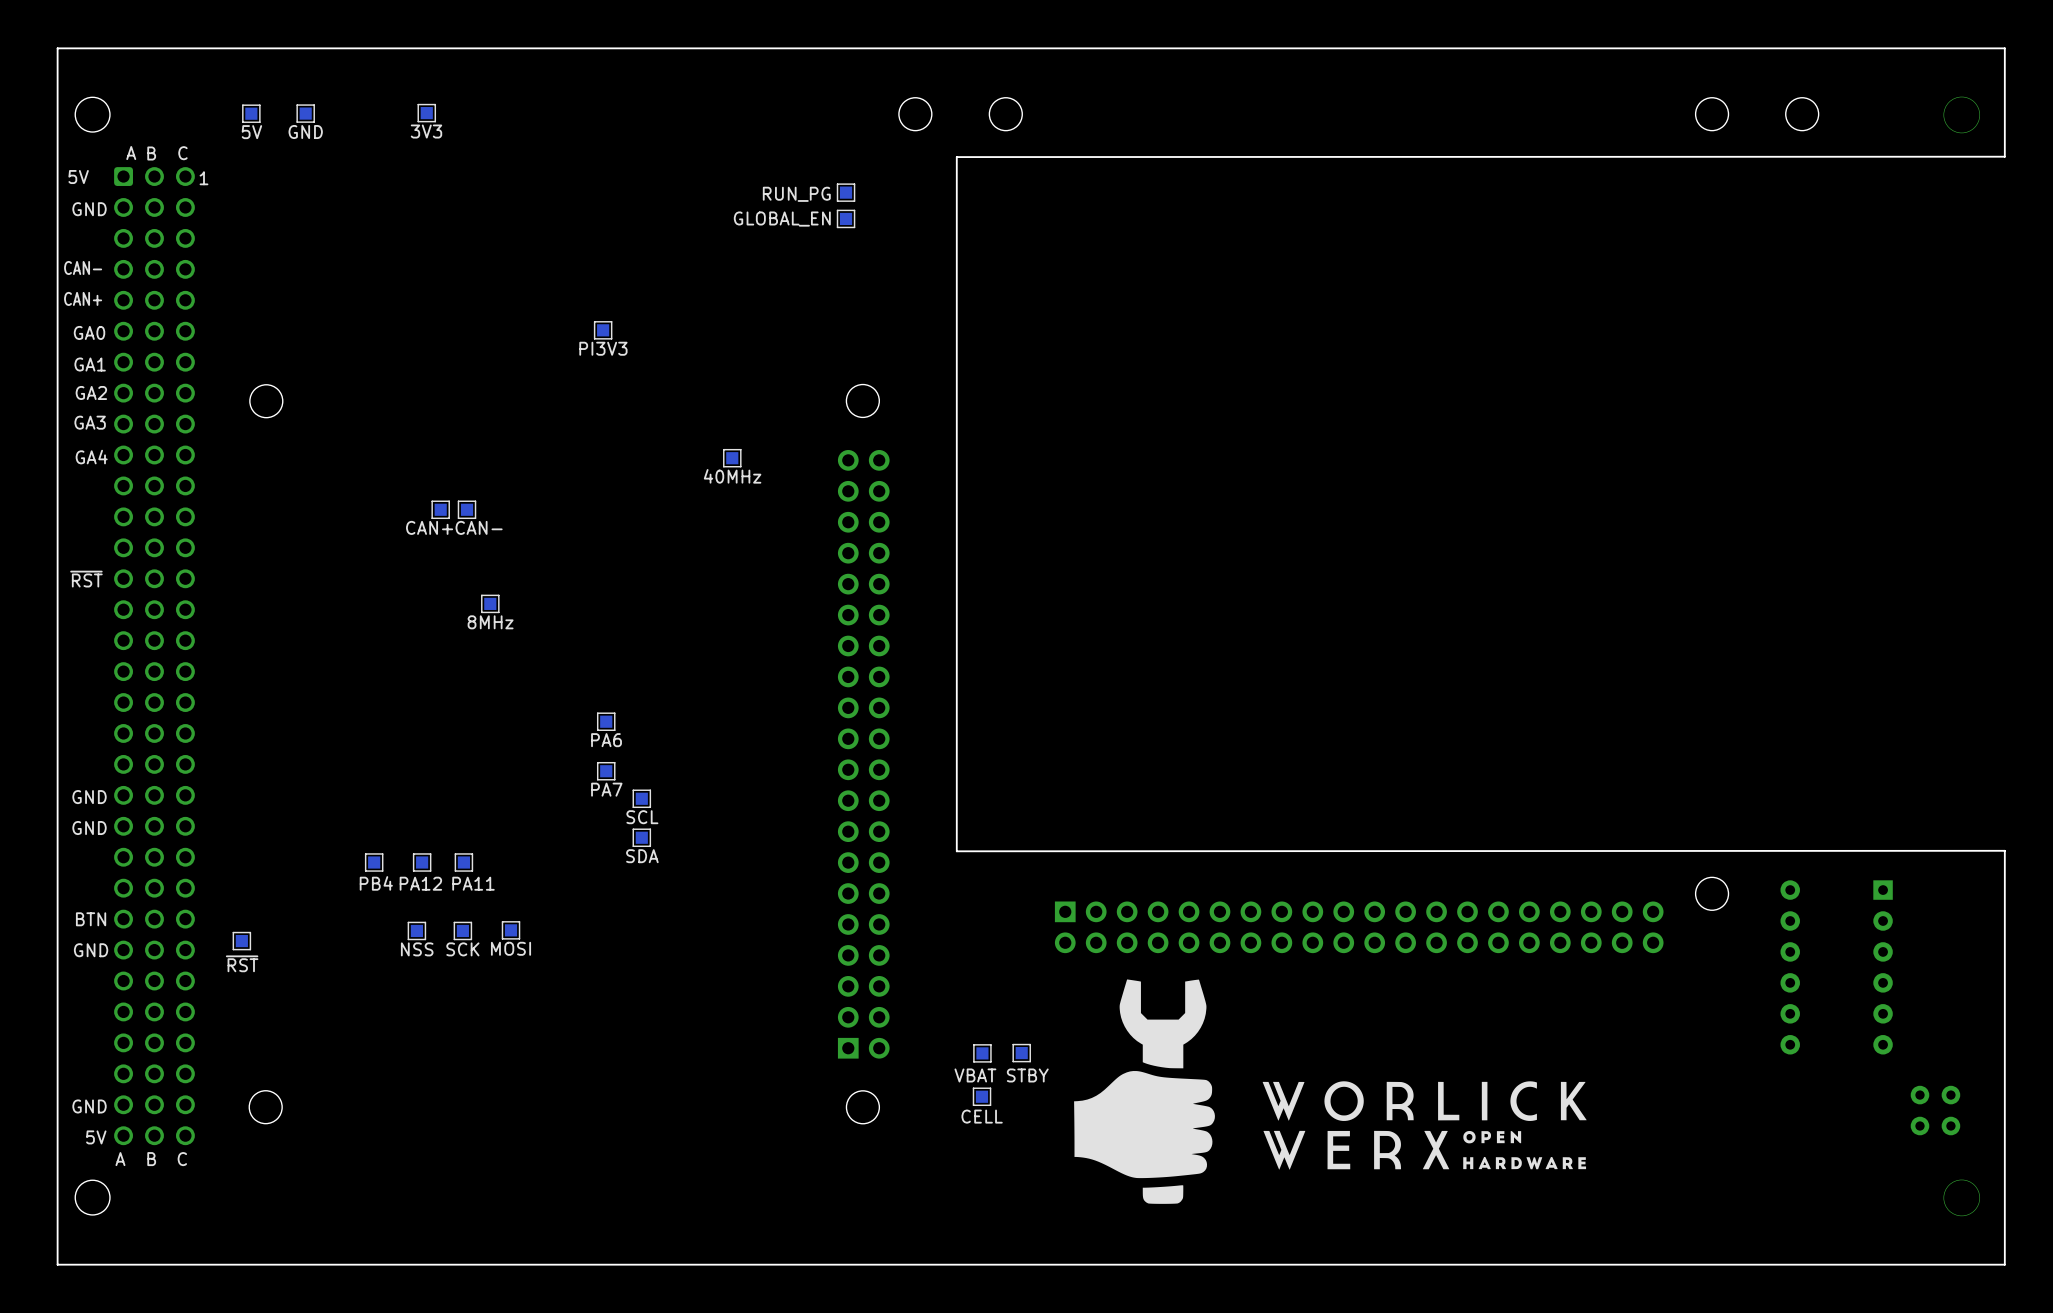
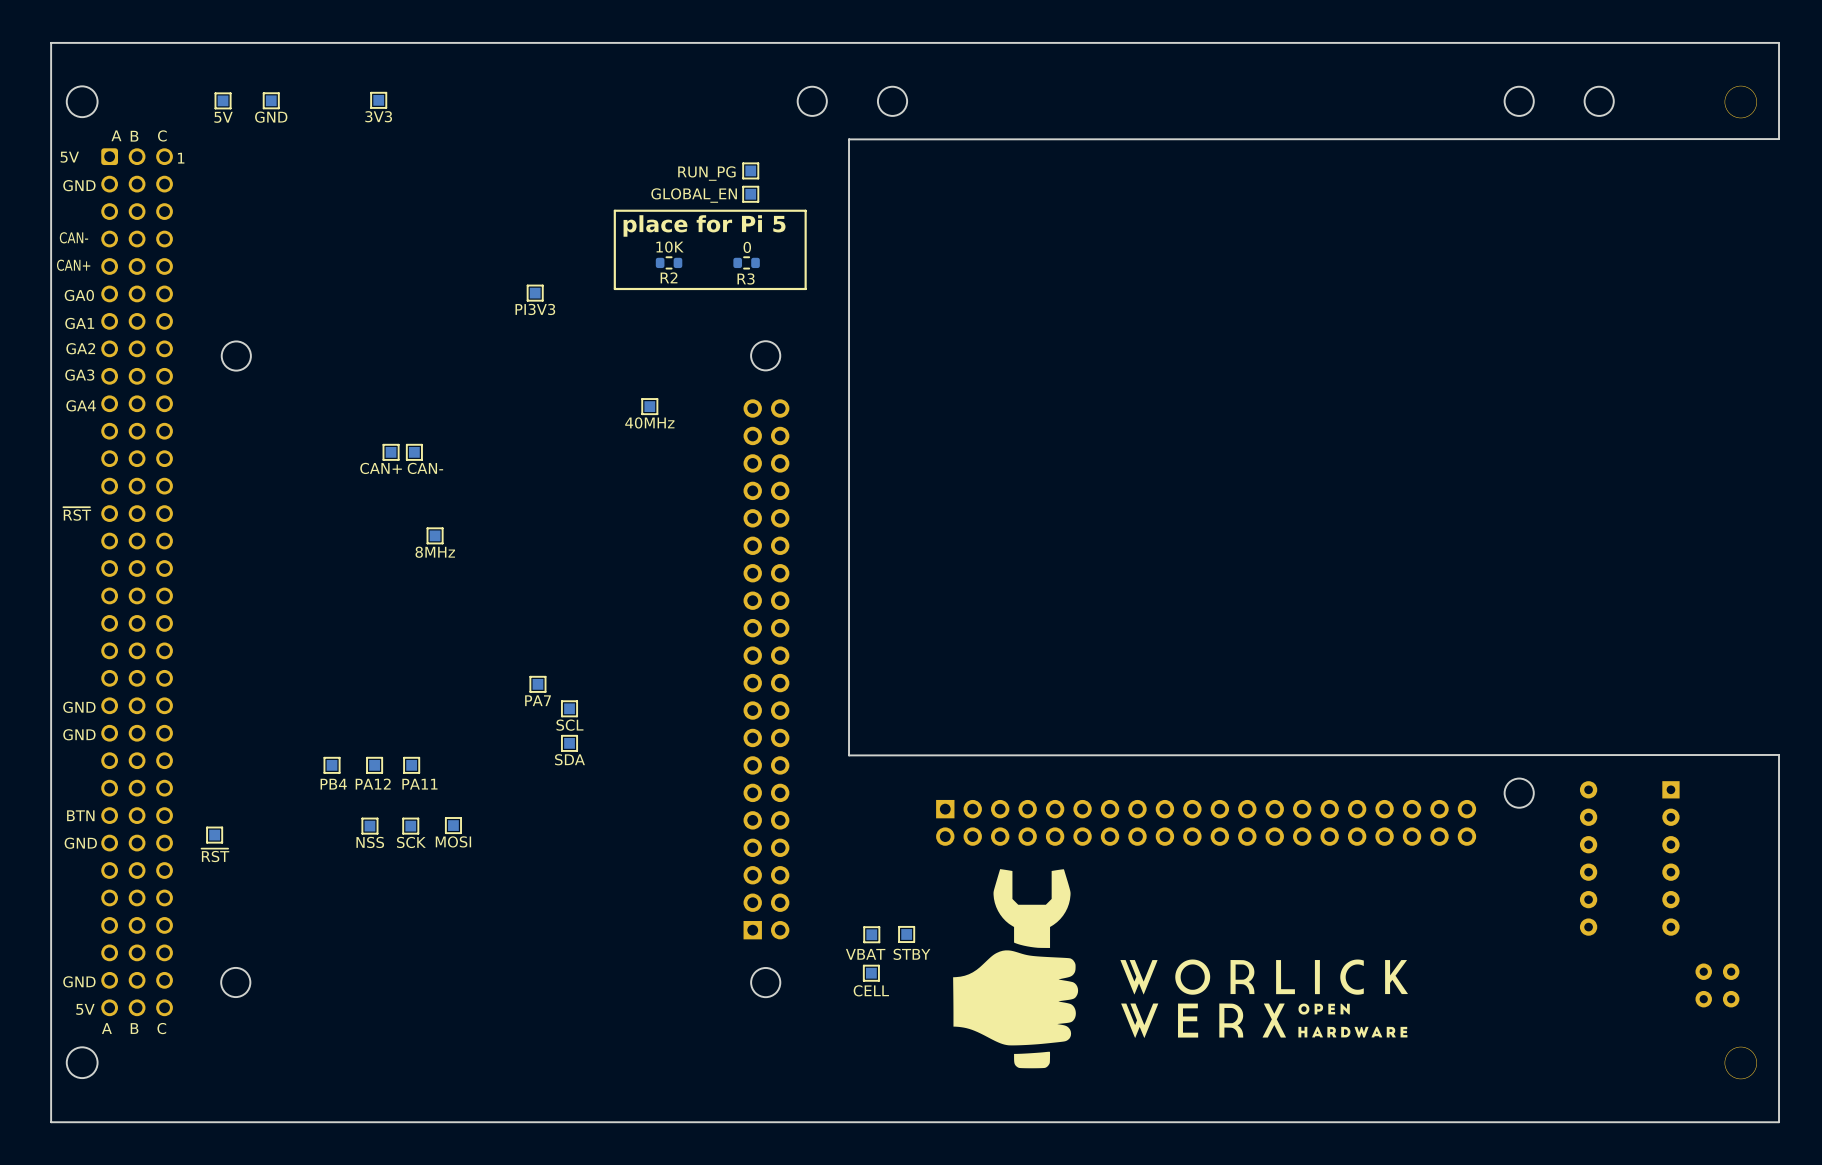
line: none -> (805, 210) (614, 210) (614, 288) (805, 288) (805, 210)
text: none -> place for Pi 5 (704, 225)
R2: none -> 10K (669, 262)
R3: none -> 0 (746, 262)
part: PA6 (606, 721) -> none

